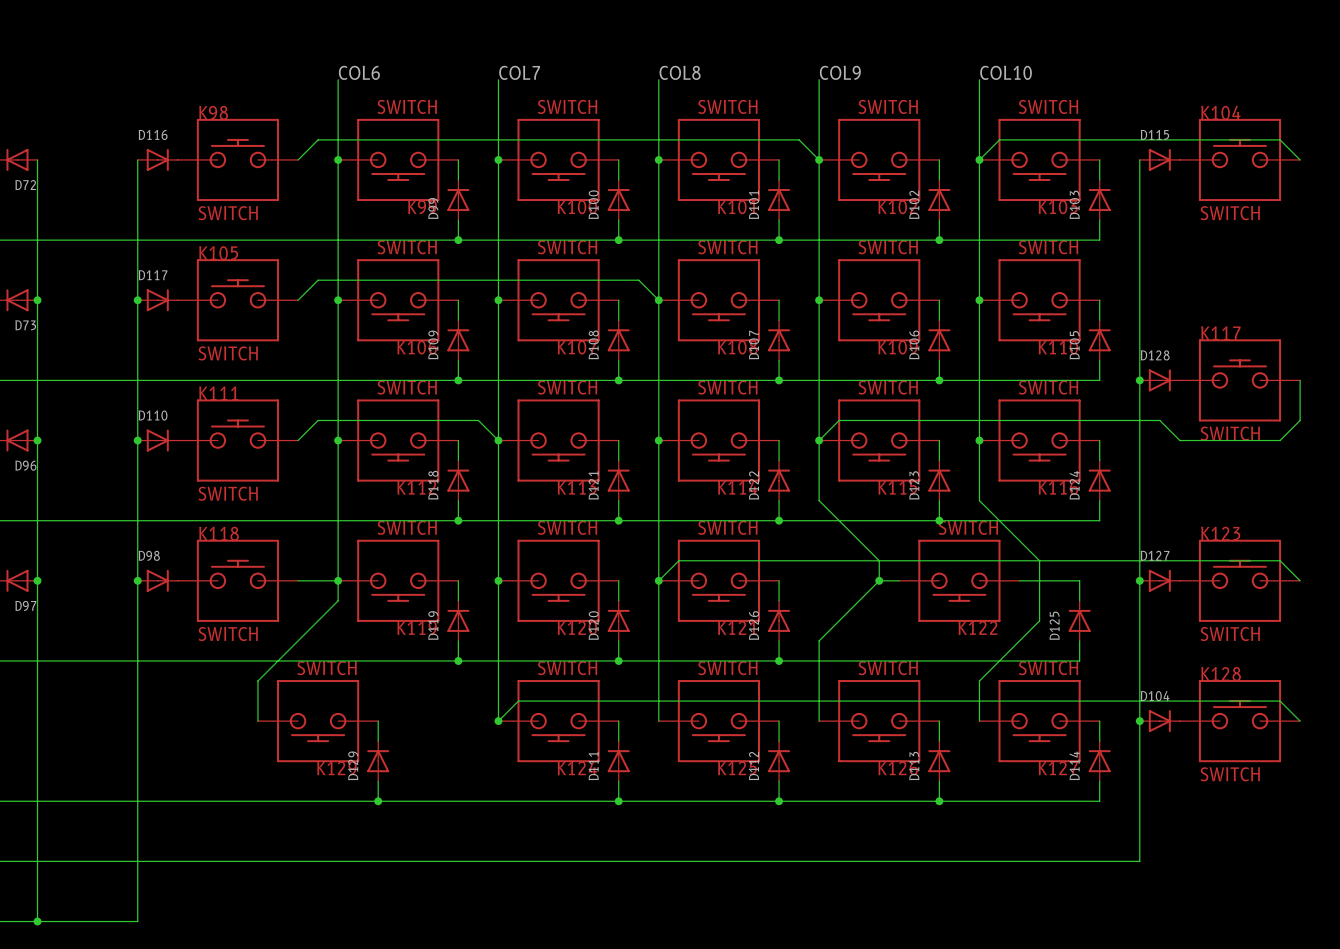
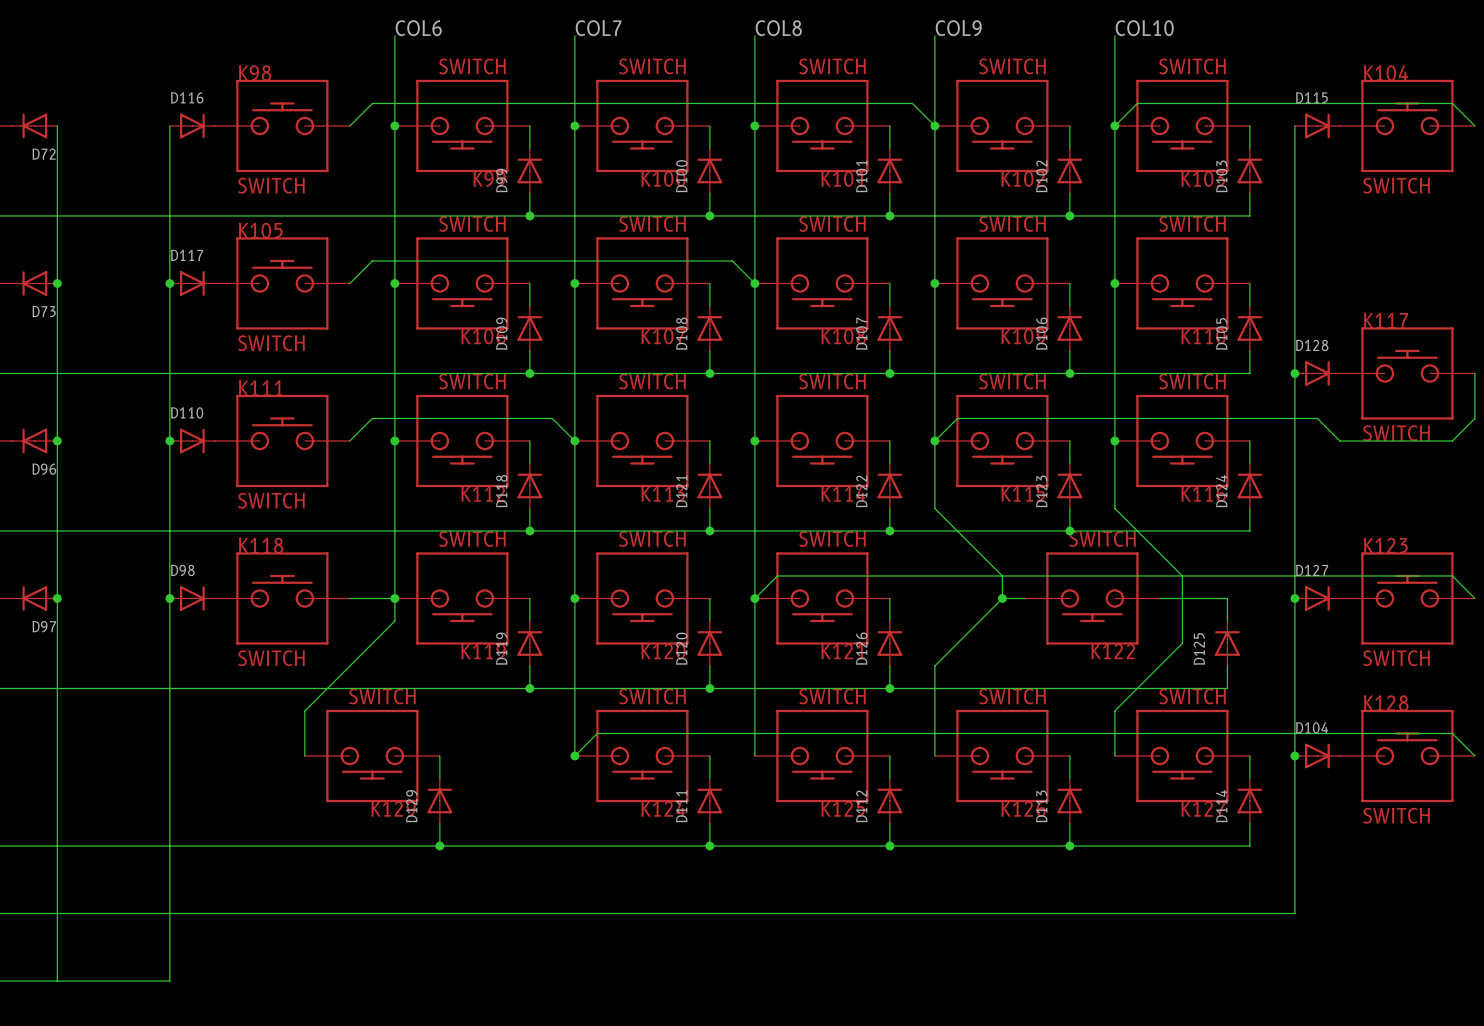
junction: (37, 921) -> none

